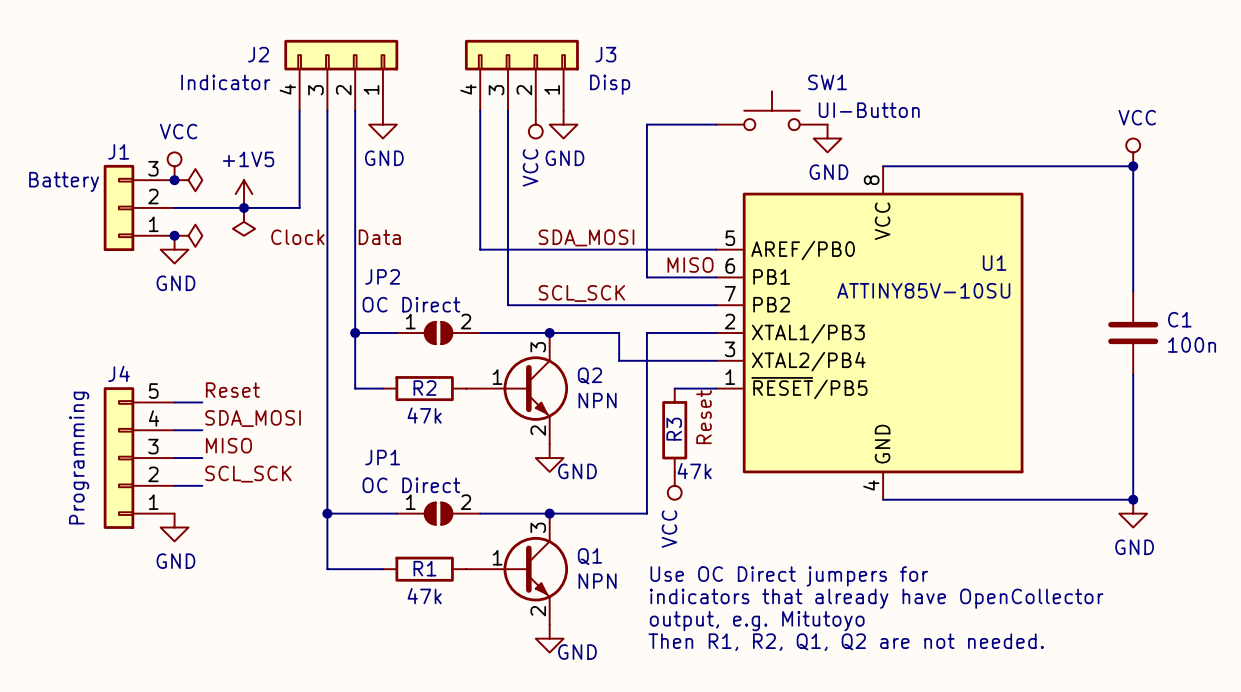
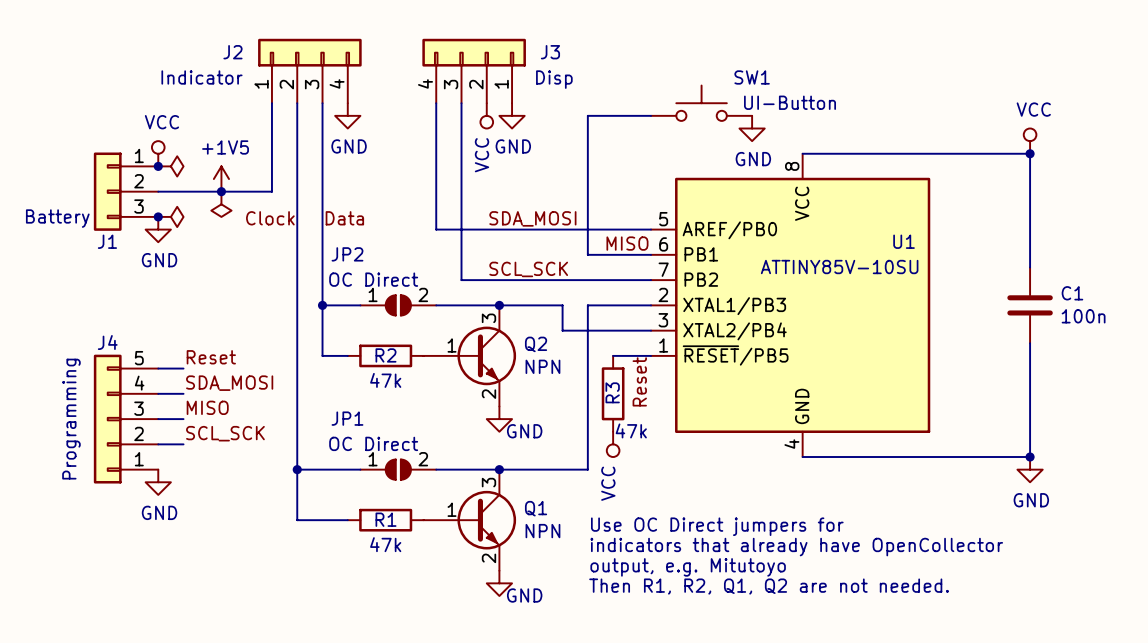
J2 flip: as is (341, 55) -> left-right (309, 52)
J2 value position: Indicator (225, 82) -> Indicator (201, 77)
J1 flip: as is (118, 207) -> up-down (107, 191)

